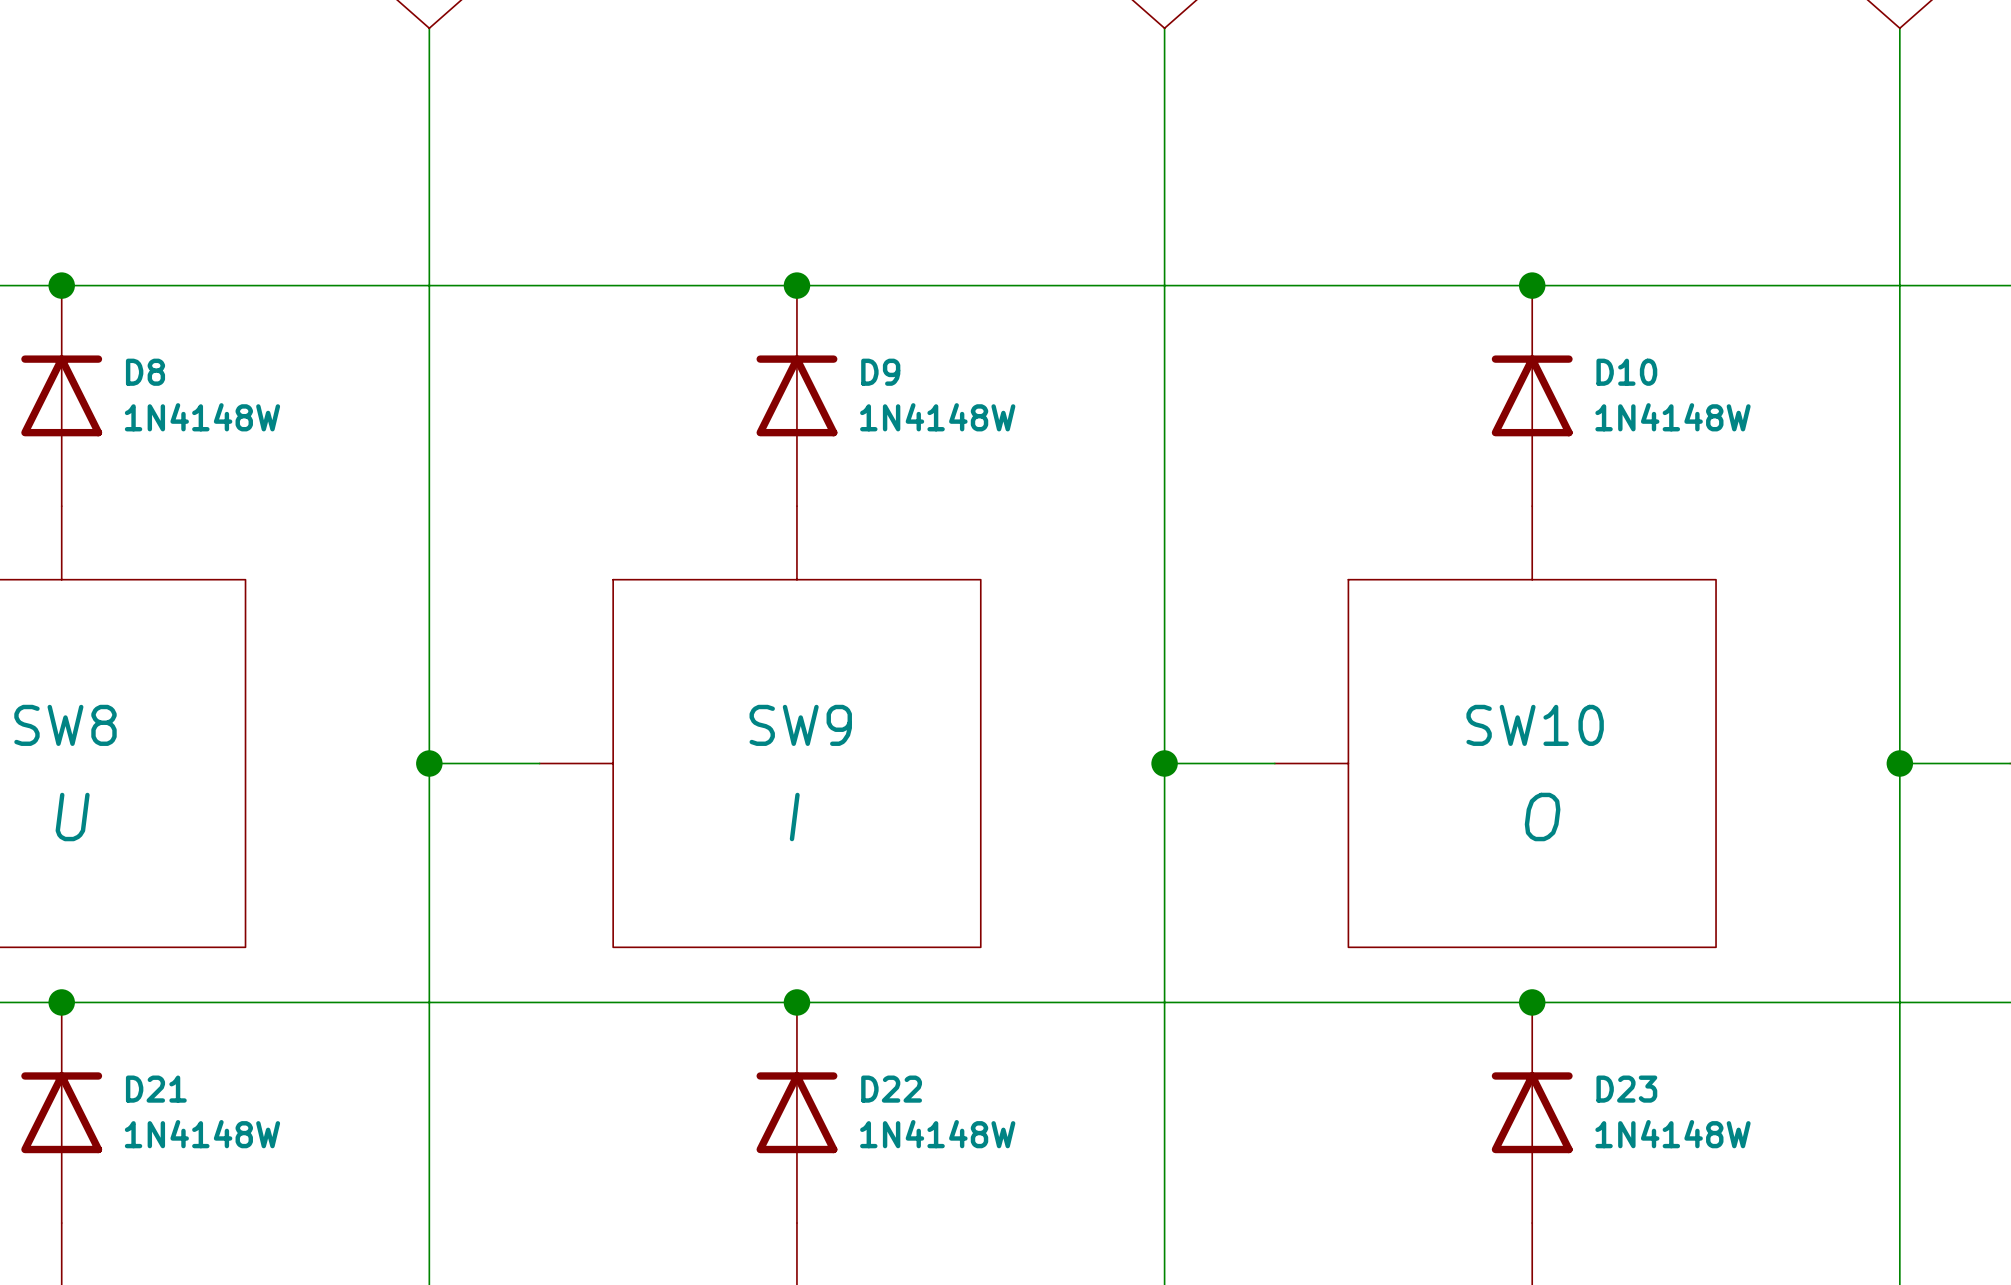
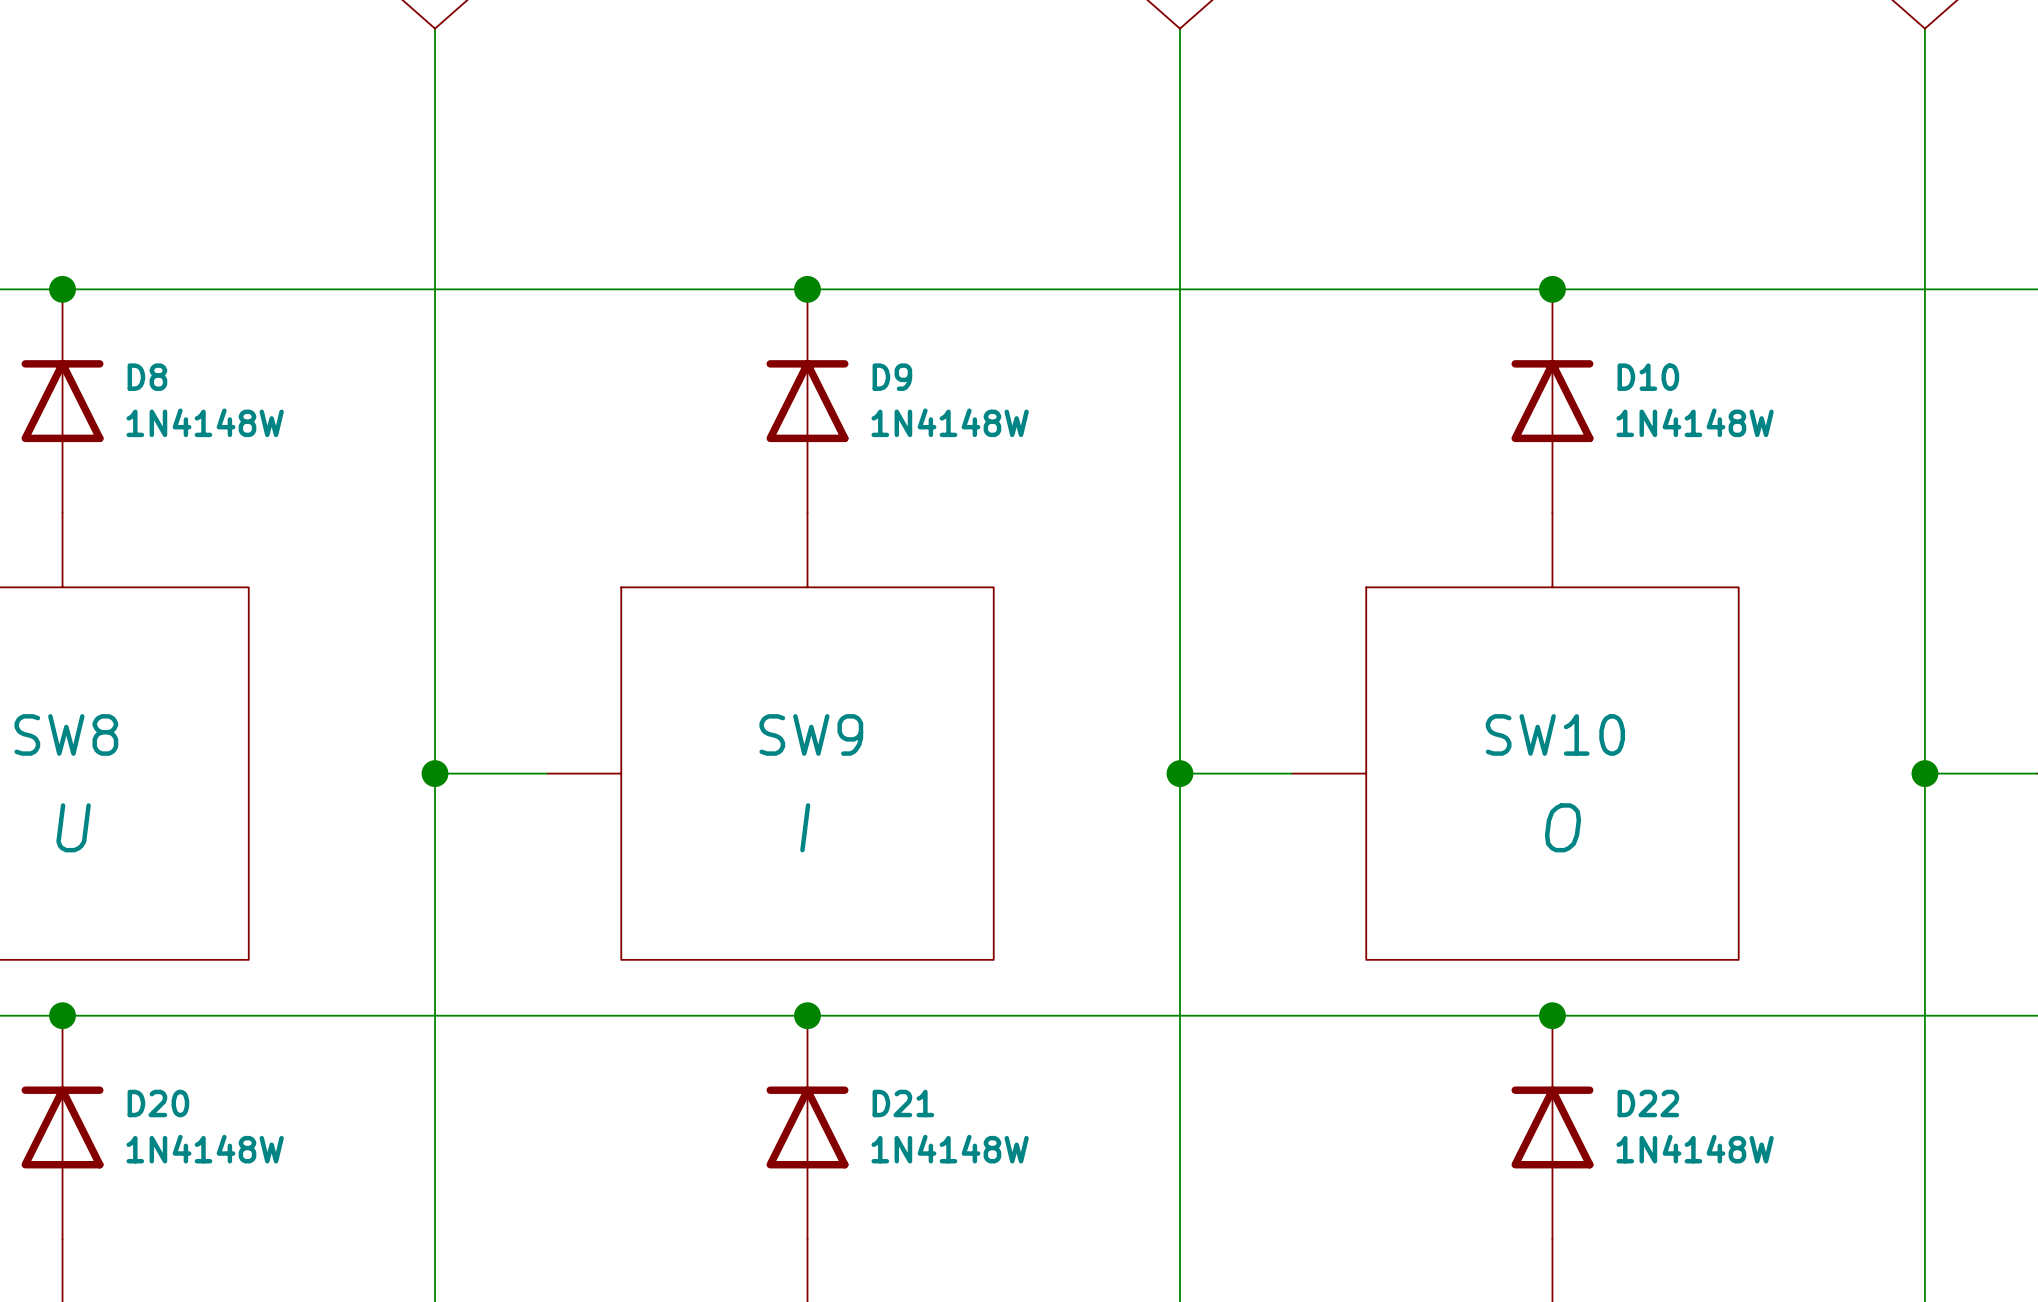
D21 name: D21 (156, 1089) -> D20 (158, 1103)
D22 name: D22 (891, 1089) -> D21 (903, 1103)
D23 name: D23 (1626, 1089) -> D22 (1648, 1103)

